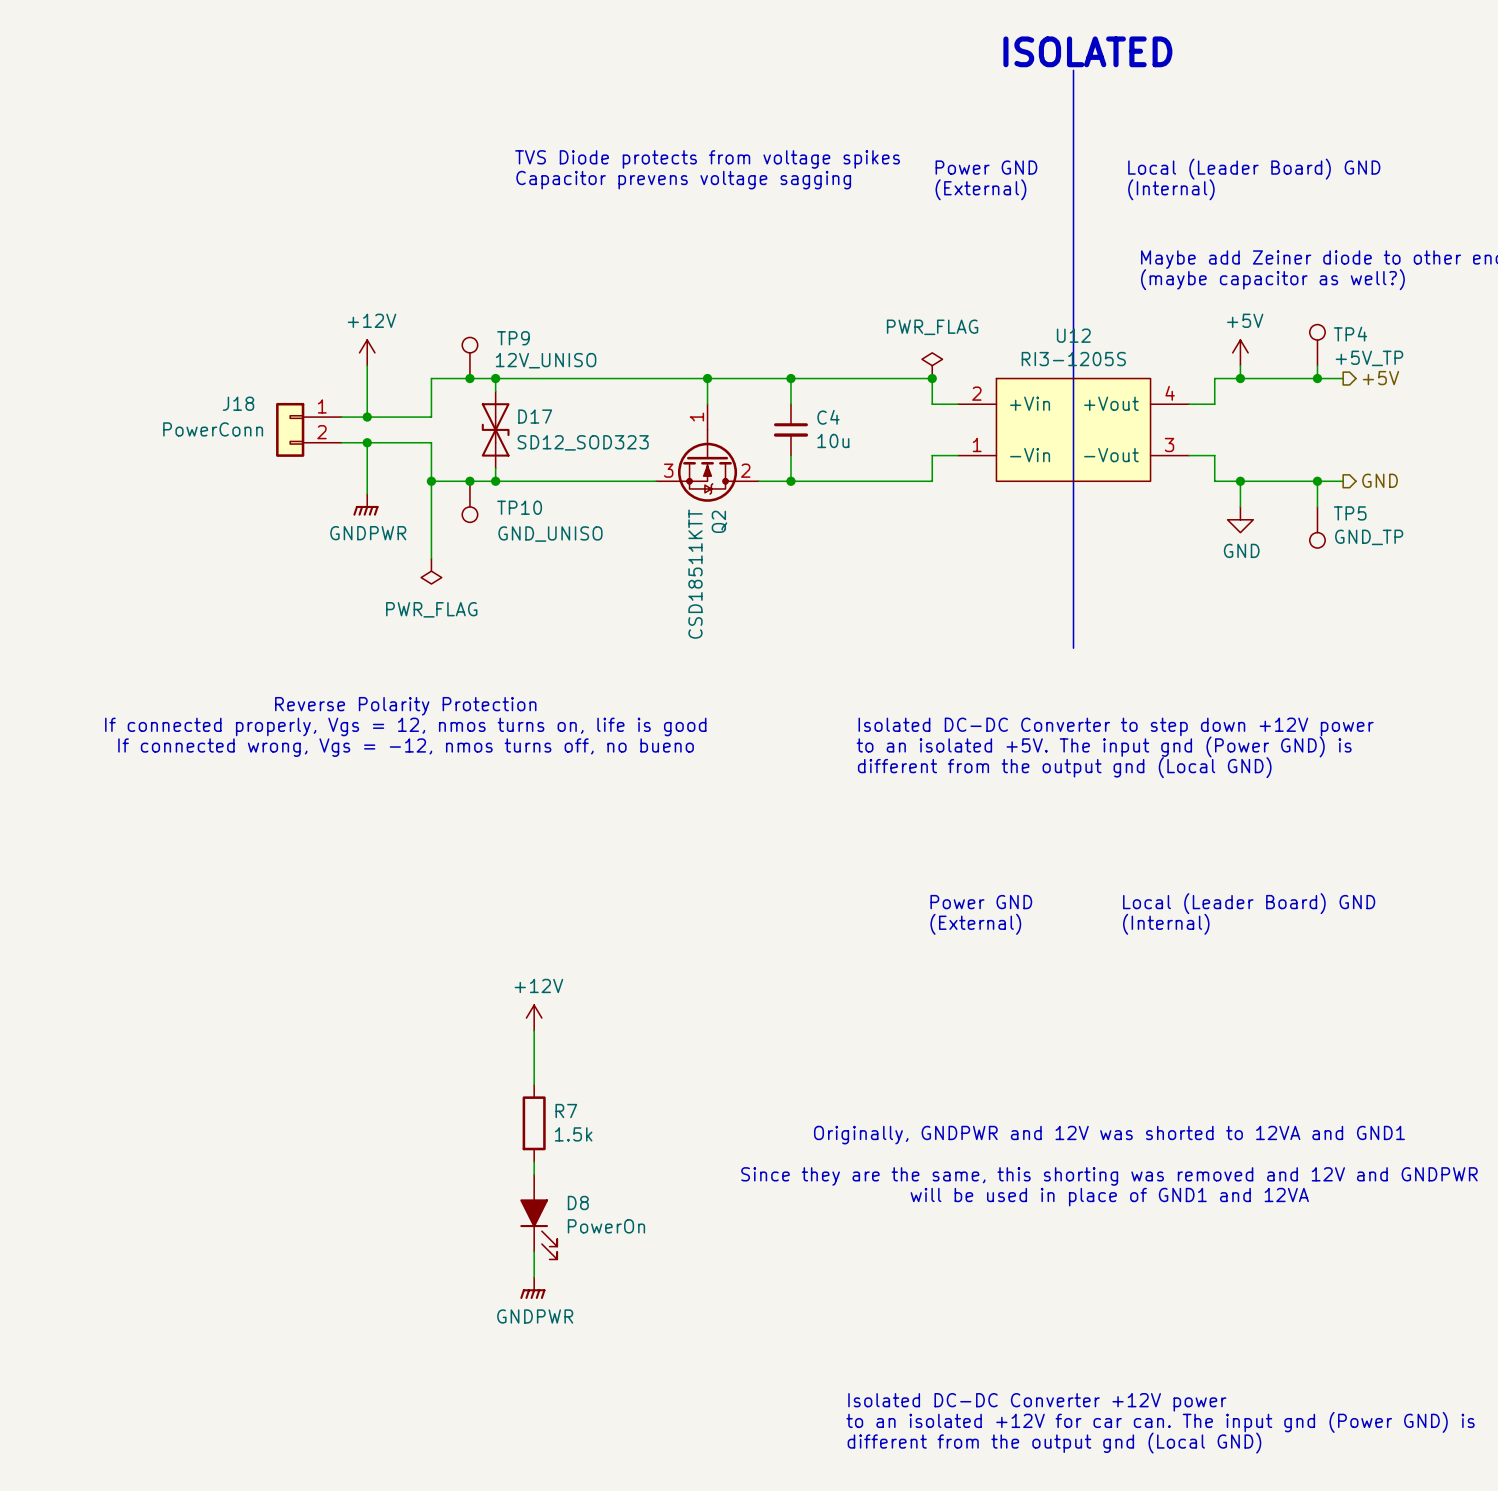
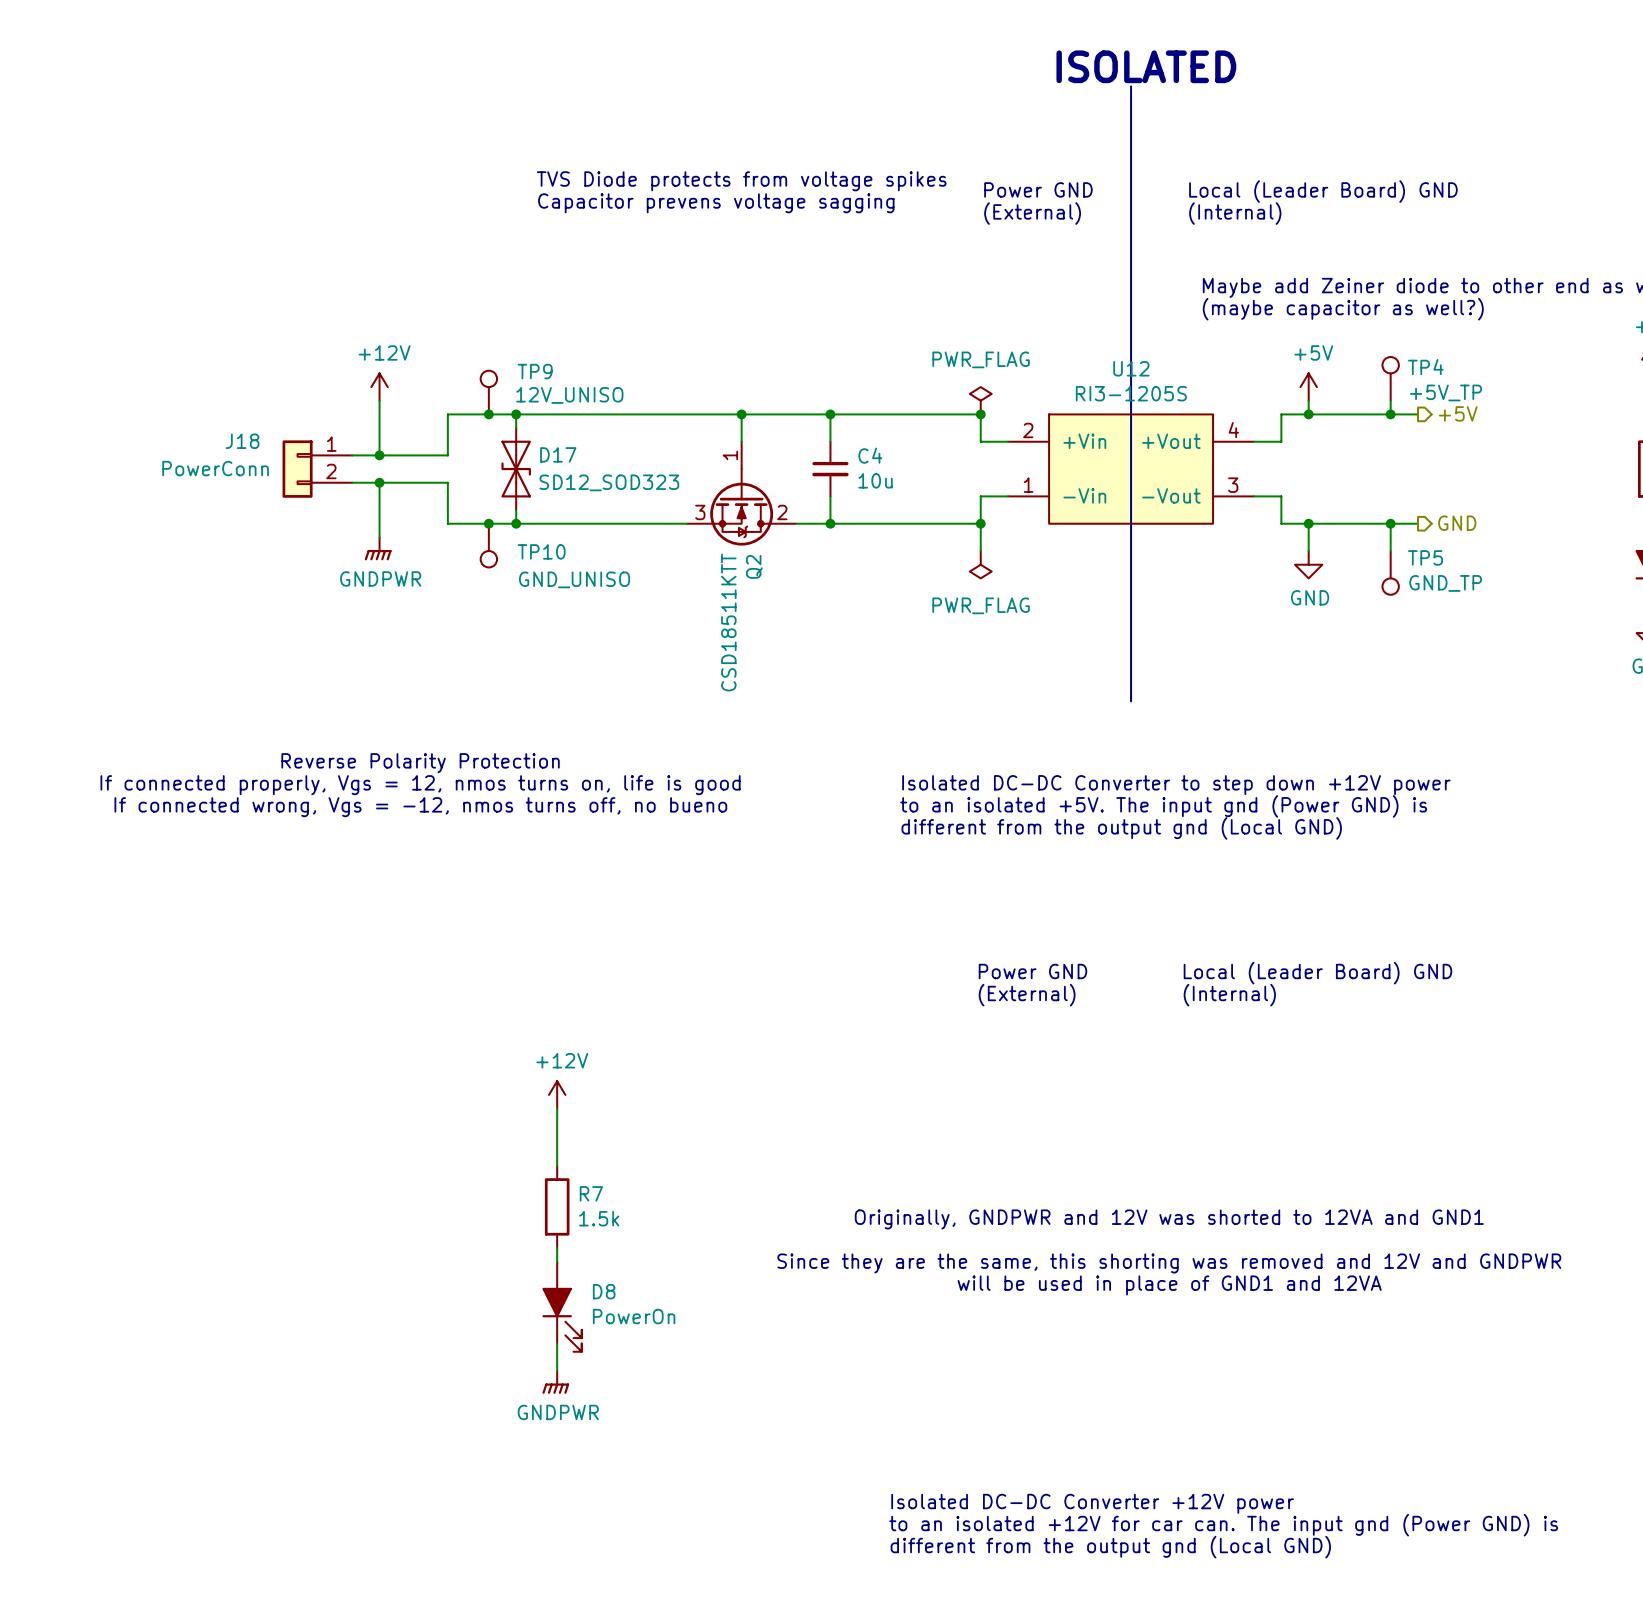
wire: (431, 481) (431, 558) -> none
junction: (431, 481) -> none
wire: none -> (980, 523) (980, 551)
junction: none -> (980, 523)
power symbol: none -> PWR_FLAG (980, 564)
power symbol: PWR_FLAG (431, 571) -> none

